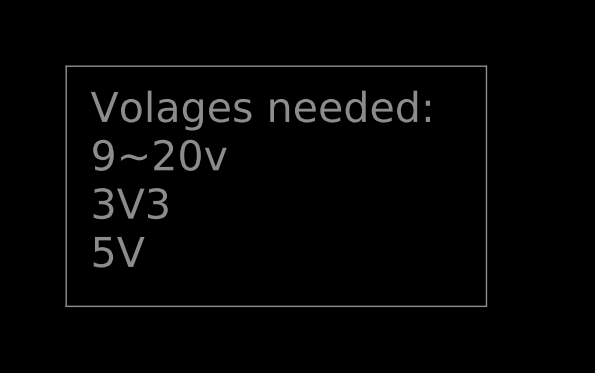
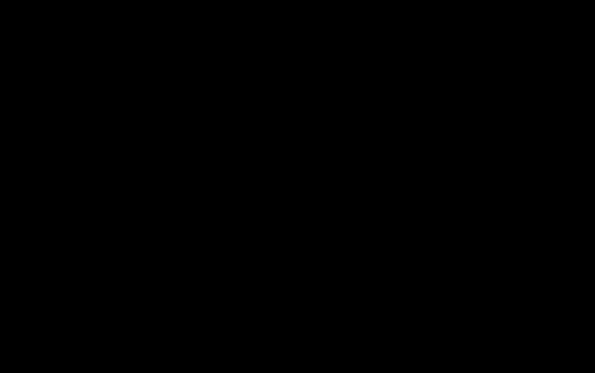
line: (66, 66) (486, 66) (486, 306) (66, 306) (66, 66) -> none
text: Volages needed: (260, 110) -> none
text: 9~20v (159, 155) -> none
text: 3V3 (130, 203) -> none
text: 5V (119, 252) -> none

